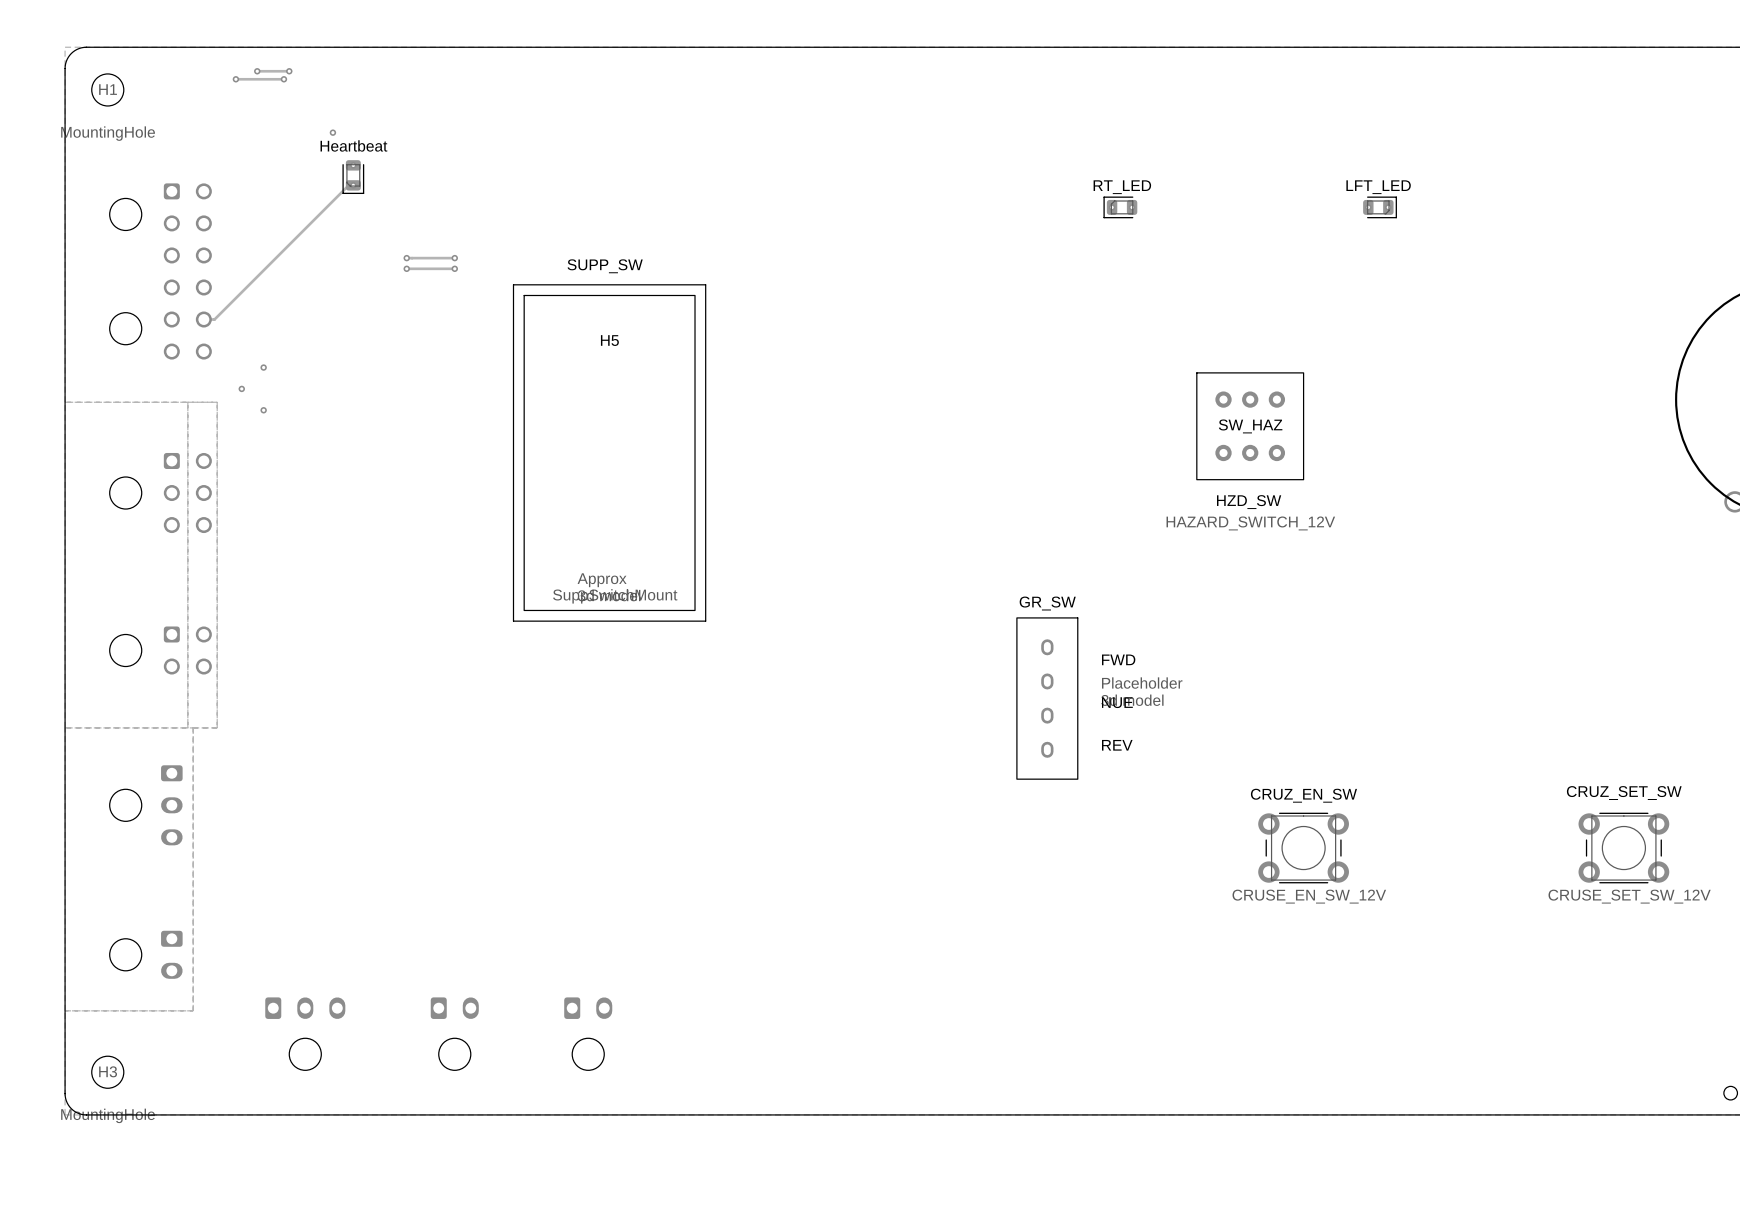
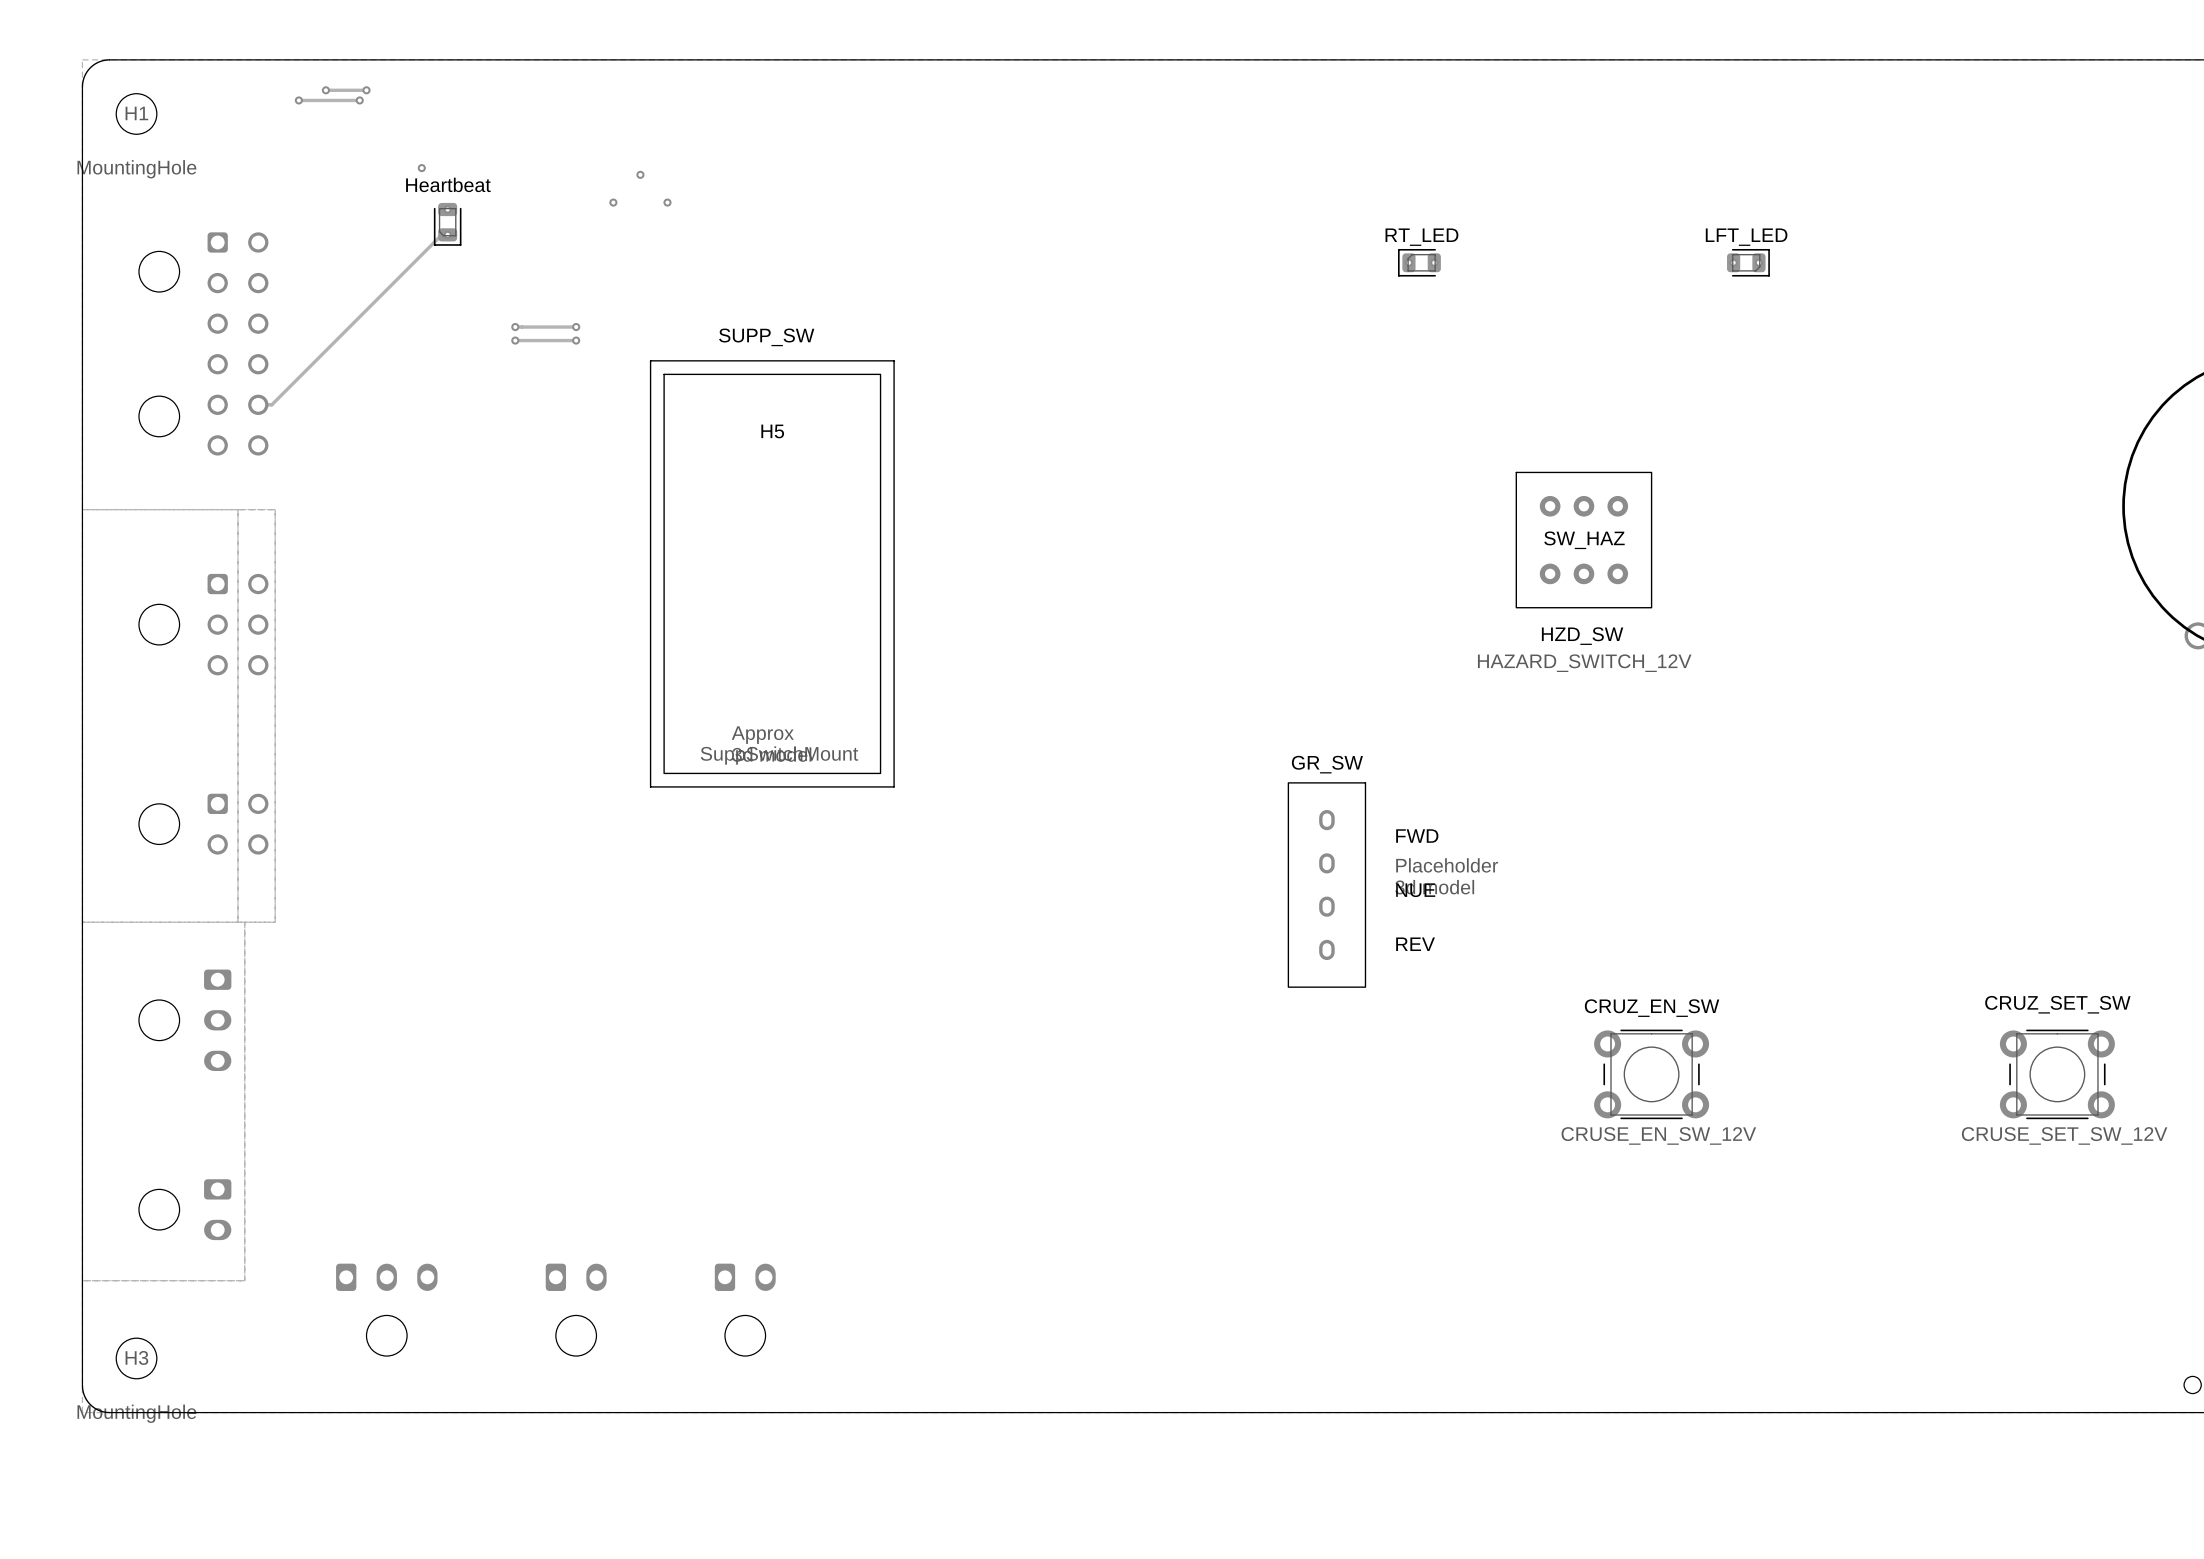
via: none -> (640, 174)
via: none -> (613, 202)
via: none -> (667, 202)
via: (263, 367) -> none
via: (241, 388) -> none
via: (263, 410) -> none

